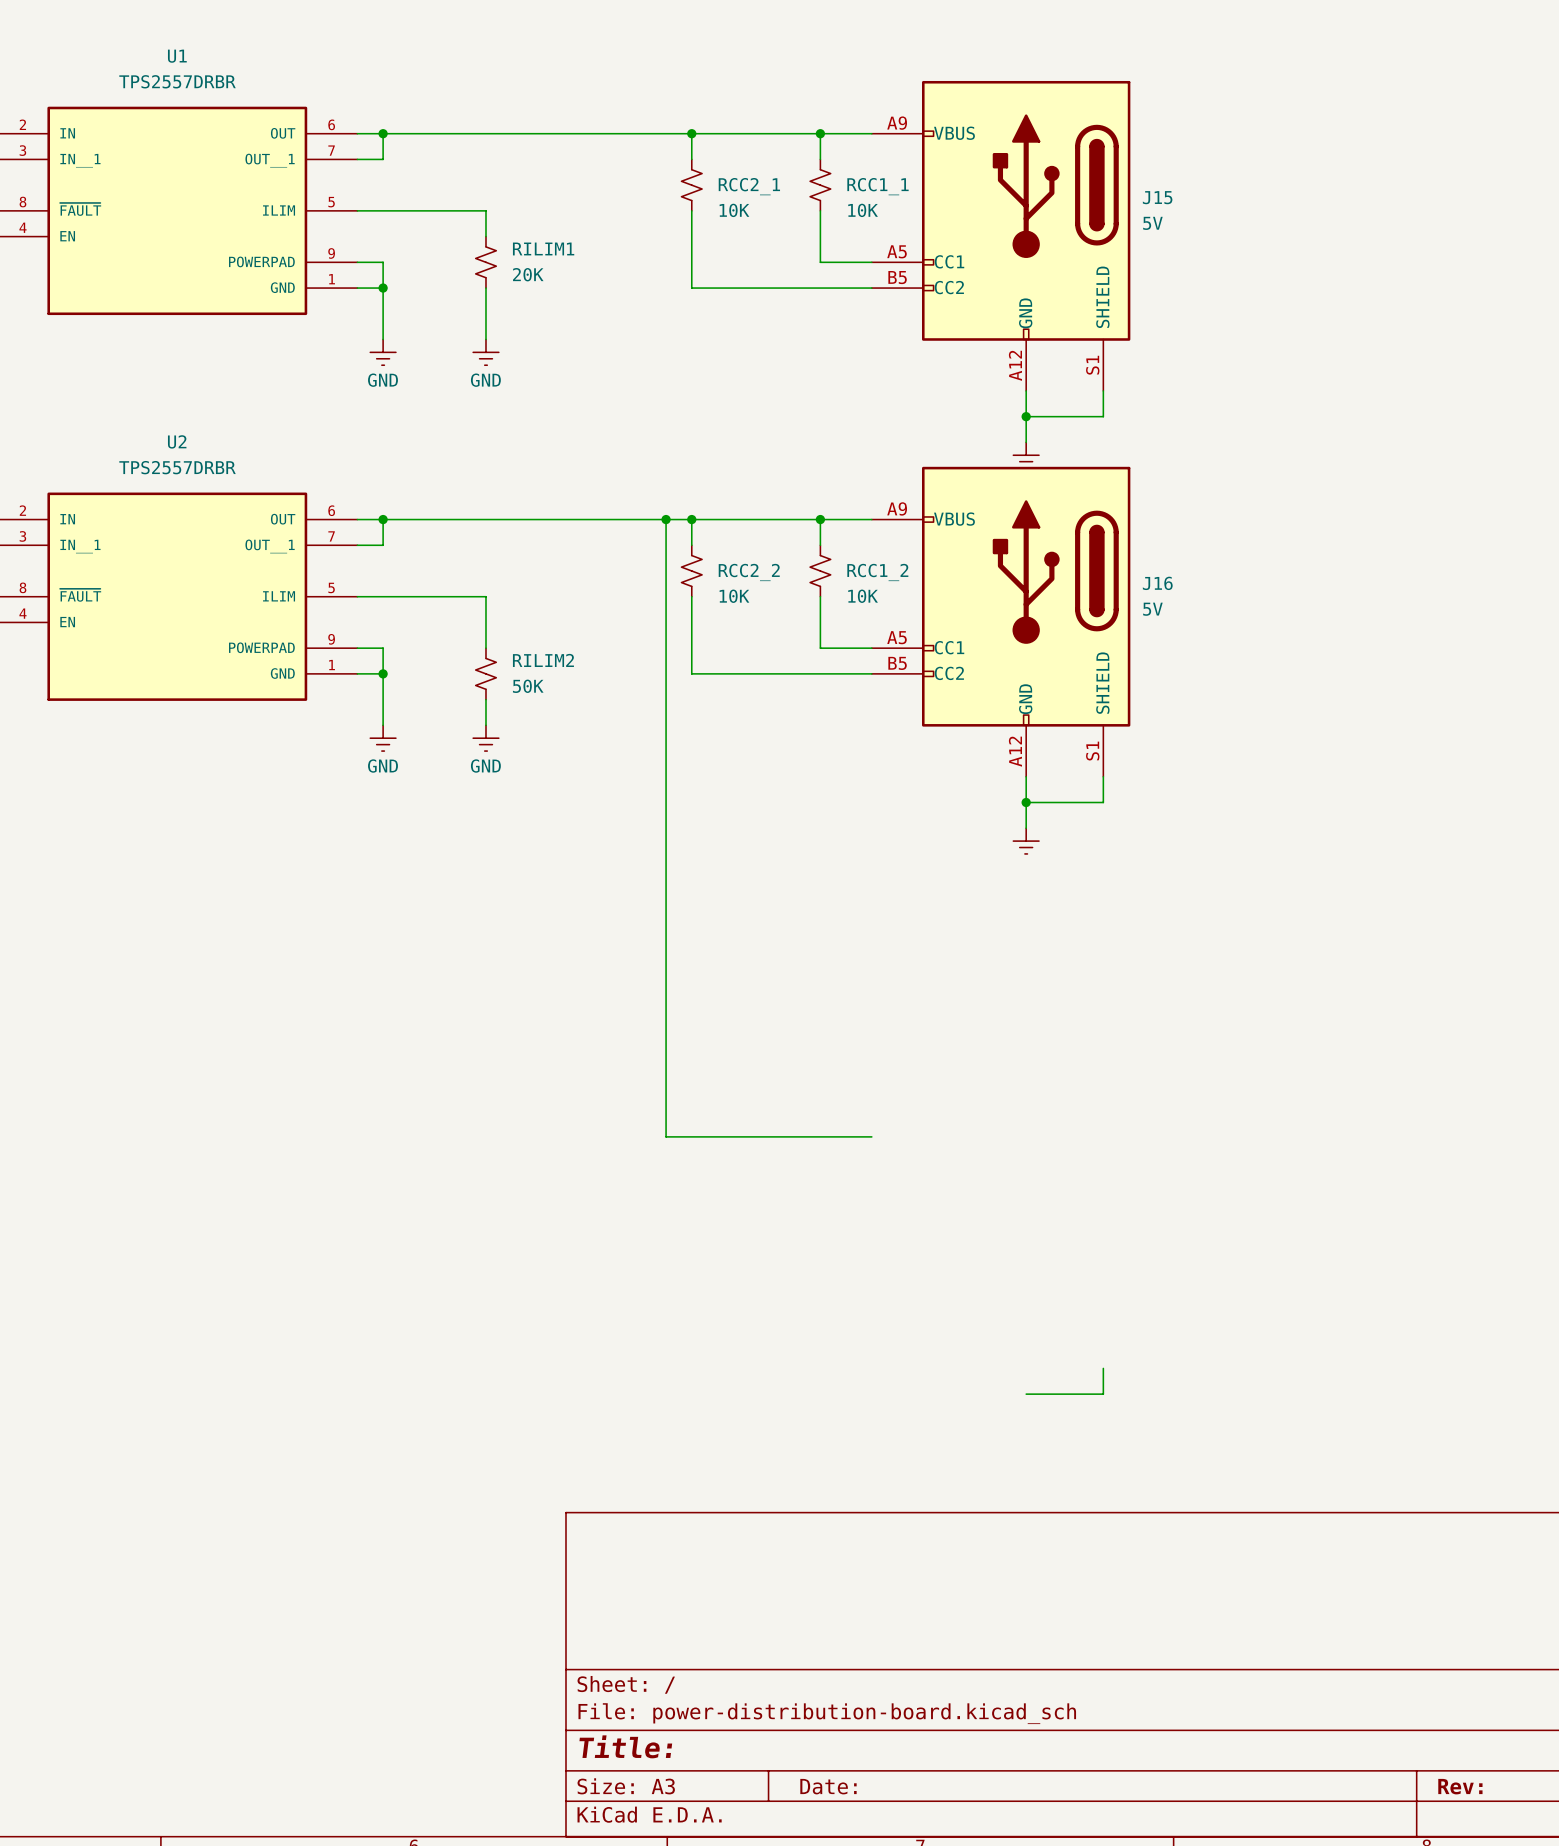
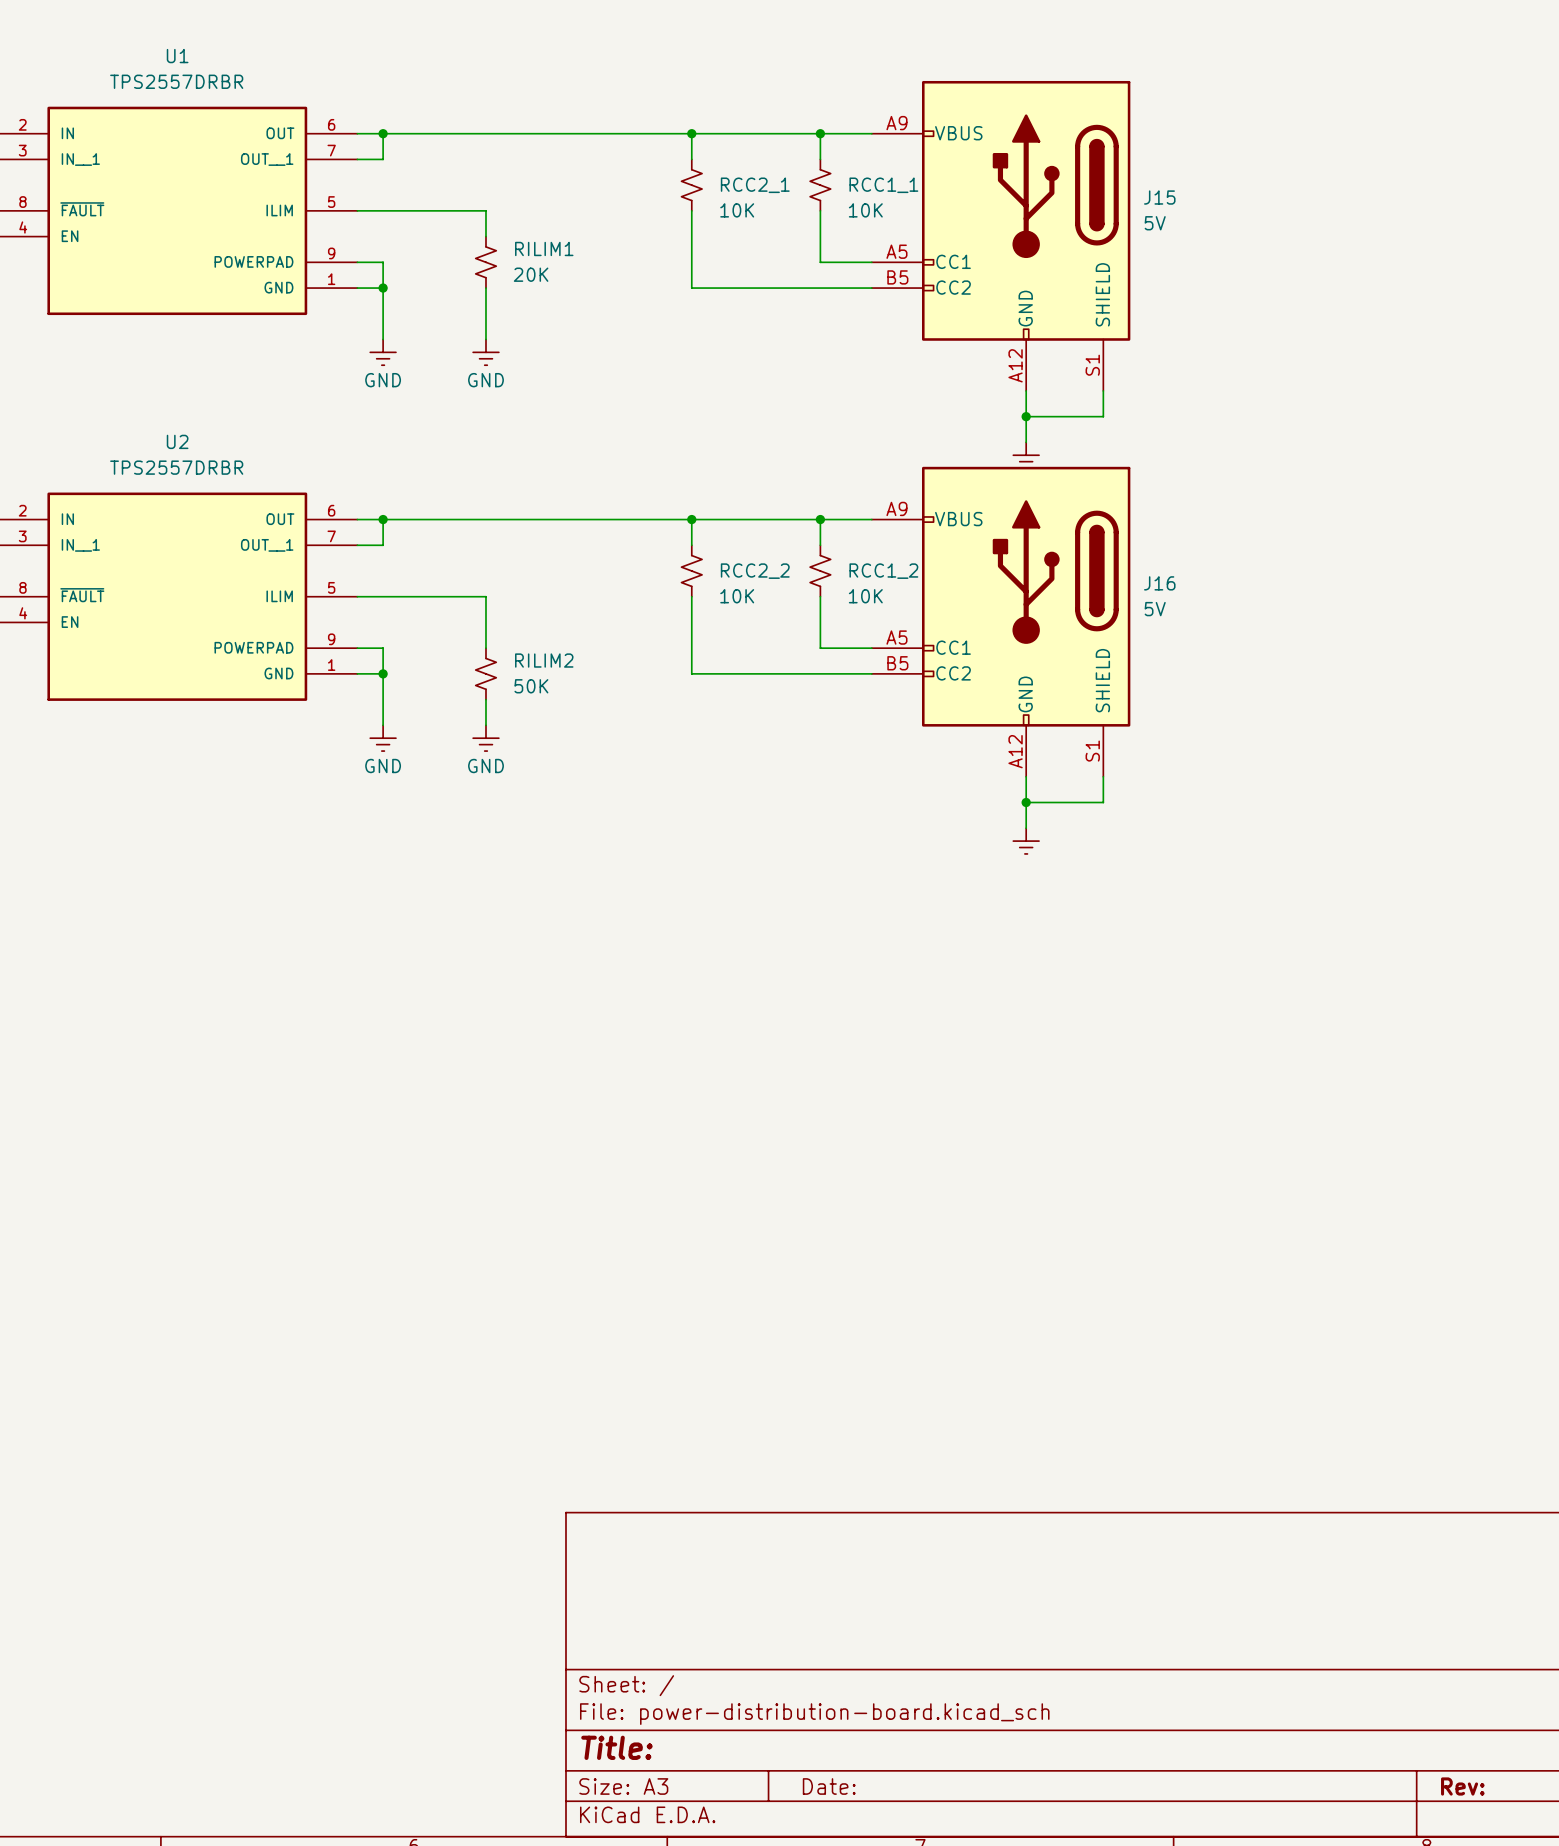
wire: (666, 519) (666, 1136) (871, 1136) -> none
junction: (666, 519) -> none
wire: (1103, 1368) (1103, 1394) (1026, 1394) -> none

